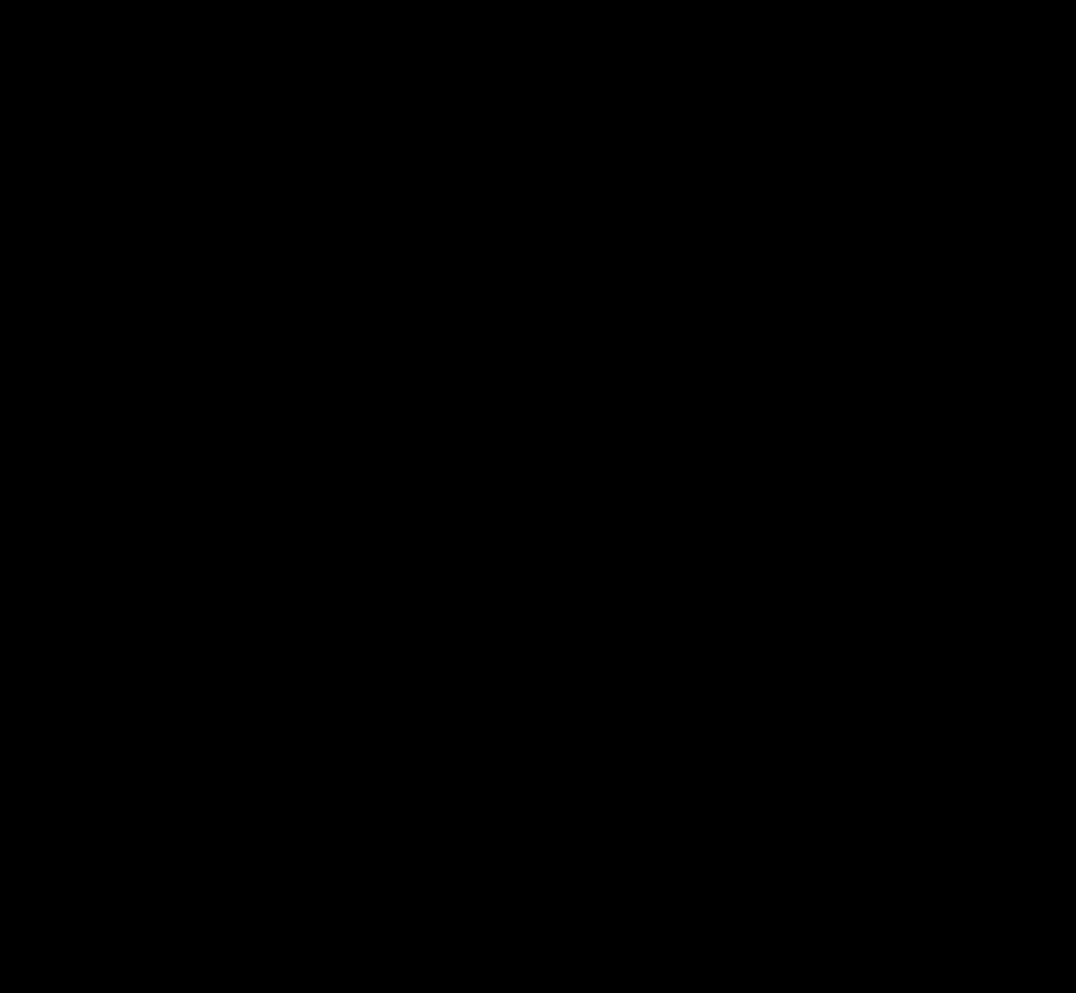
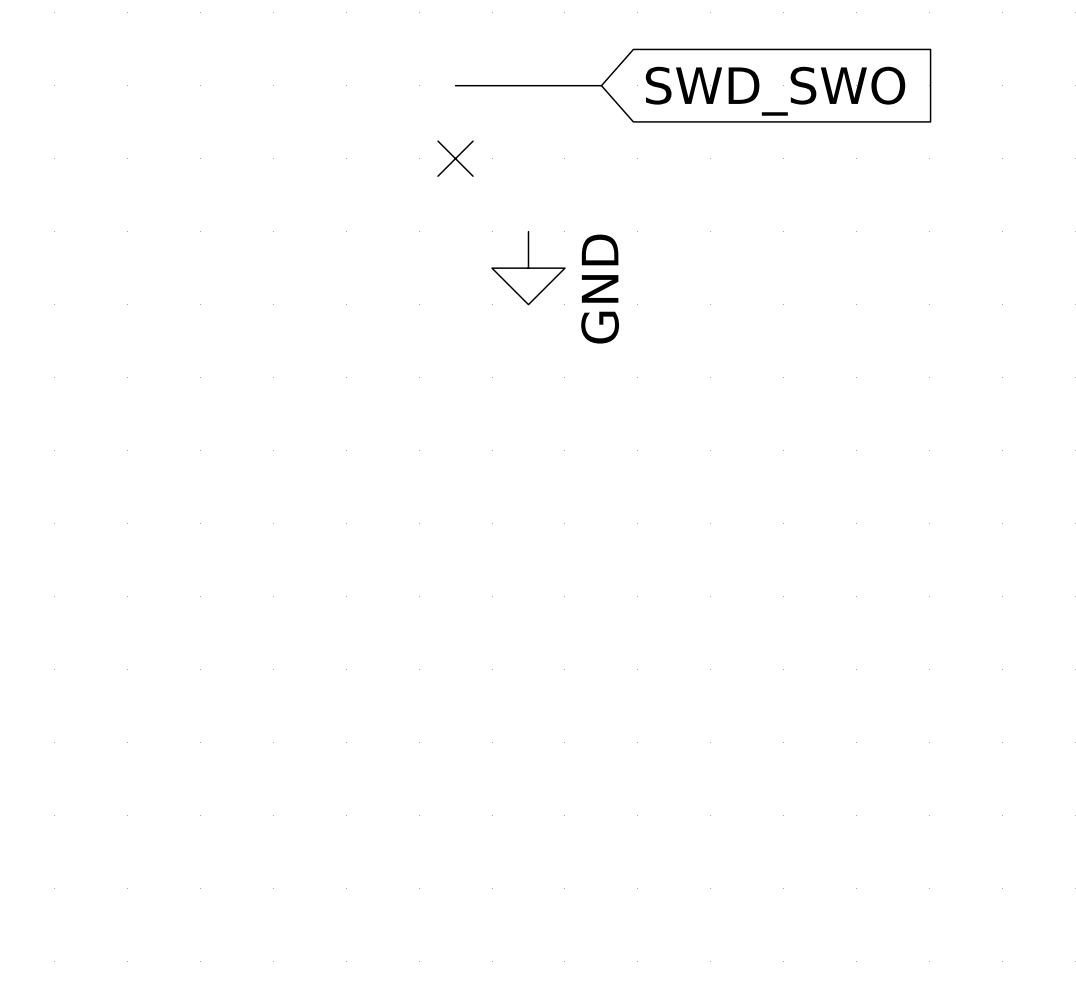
wire: none -> (455, 85) (601, 85)
global label: none -> SWD_SWO (775, 91)
no-connect mark: none -> (455, 158)
power symbol: none -> GND (528, 268)

